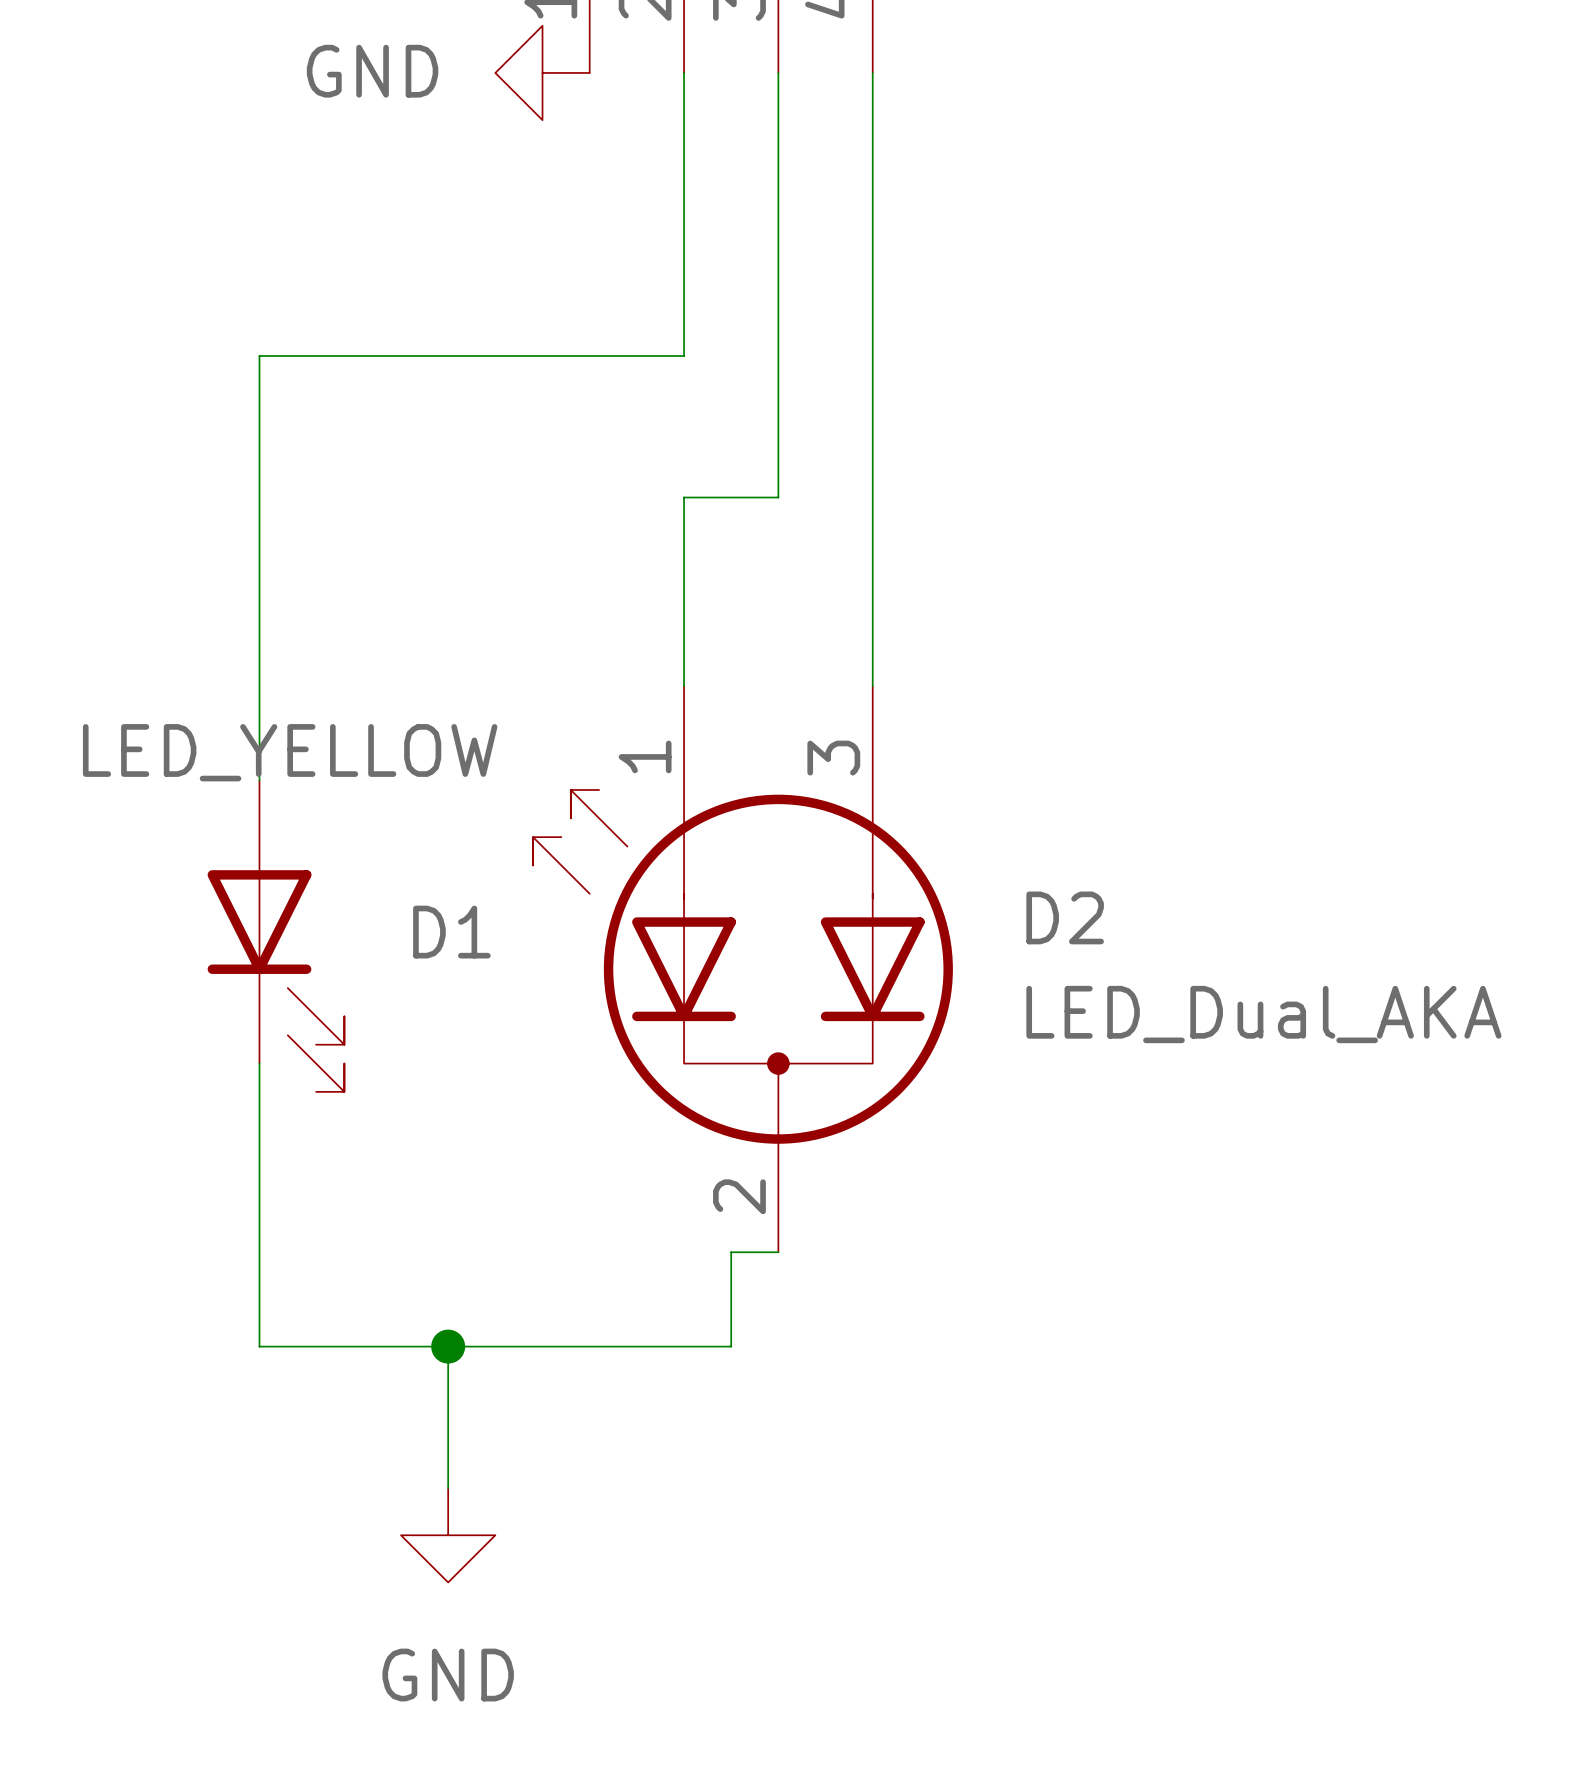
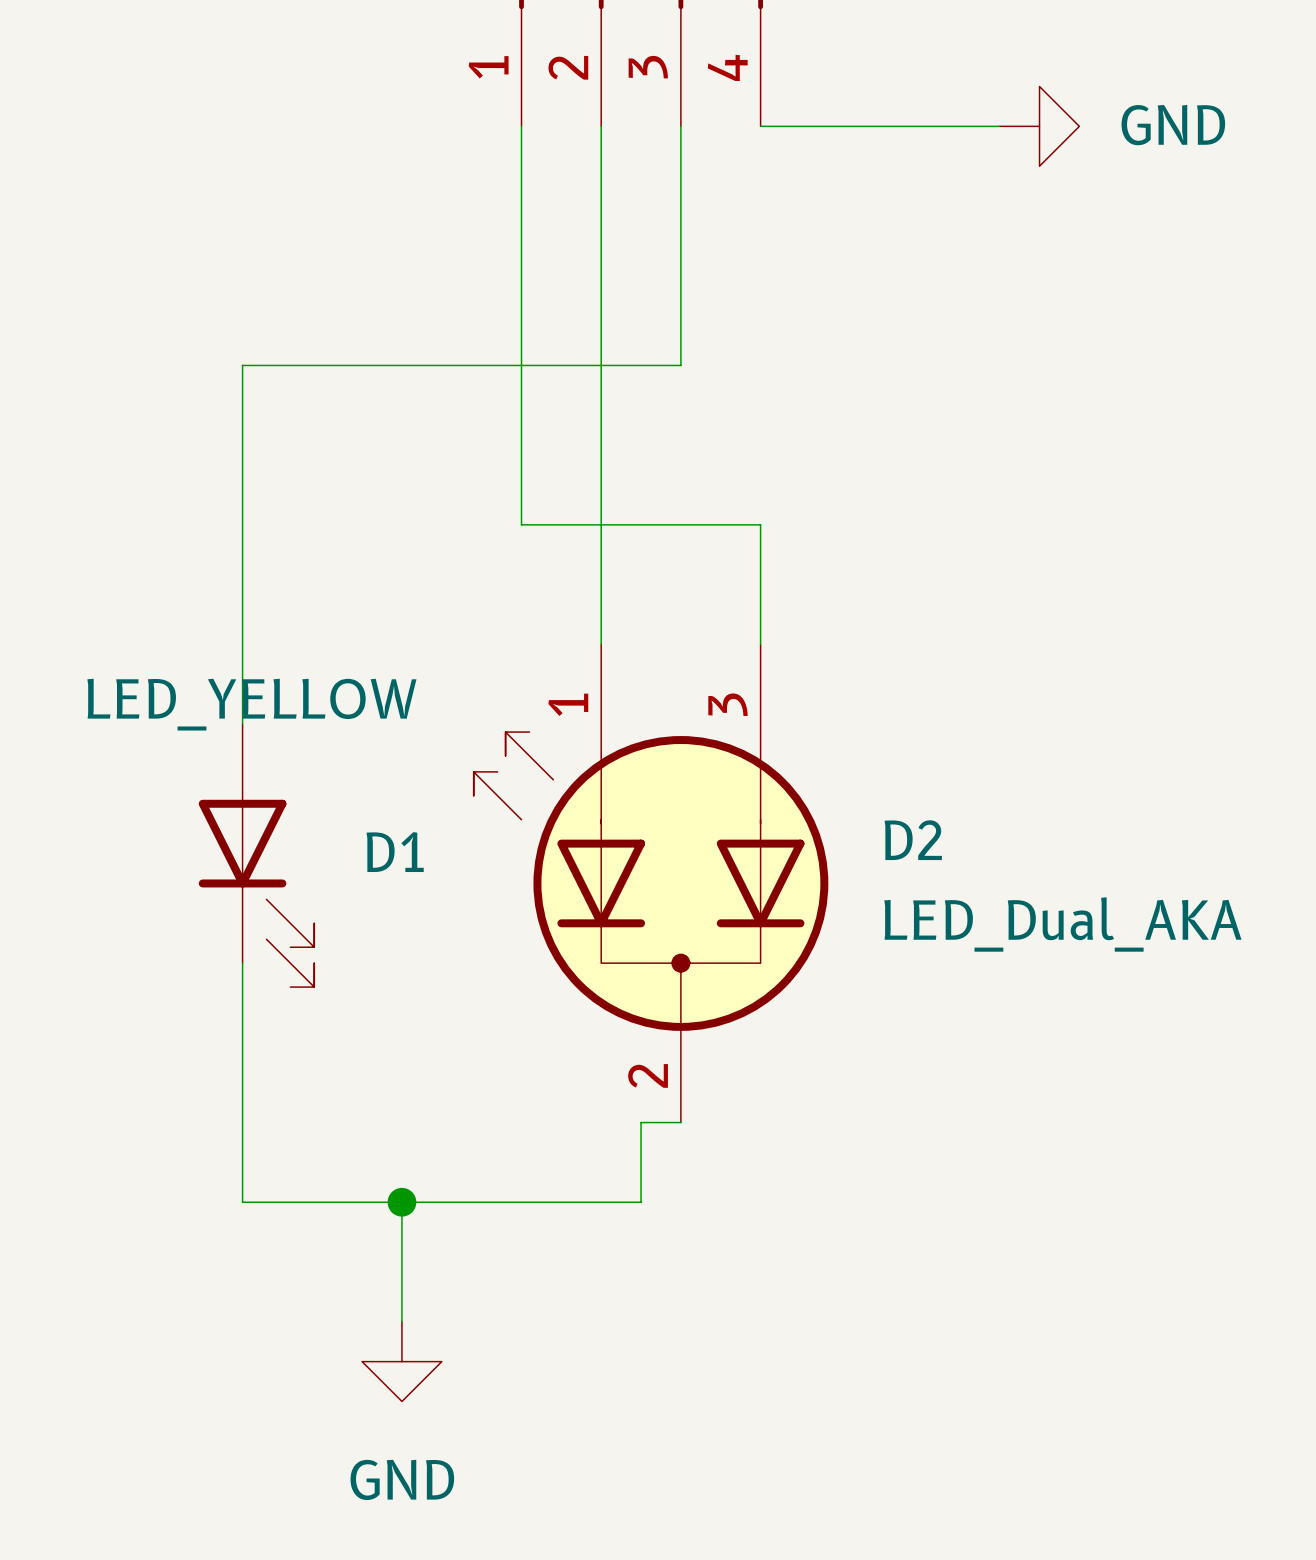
power symbol rotation: 0° (542, 72) -> 180° (1039, 126)
power symbol position: GND (542, 72) -> GND (1039, 126)
wire: (872, 72) (872, 544) -> (521, 126) (521, 524) (760, 524)
wire: none -> (760, 126) (999, 126)
wire: (778, 356) (778, 497) (684, 497) -> (680, 365) (601, 365) (601, 484)

